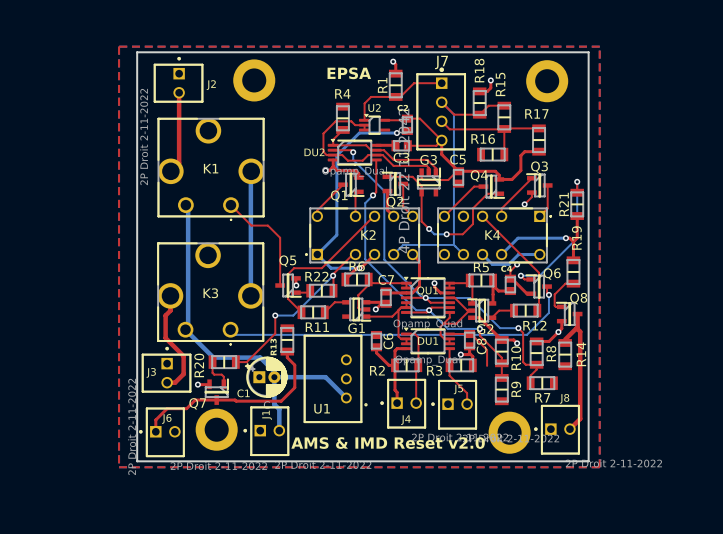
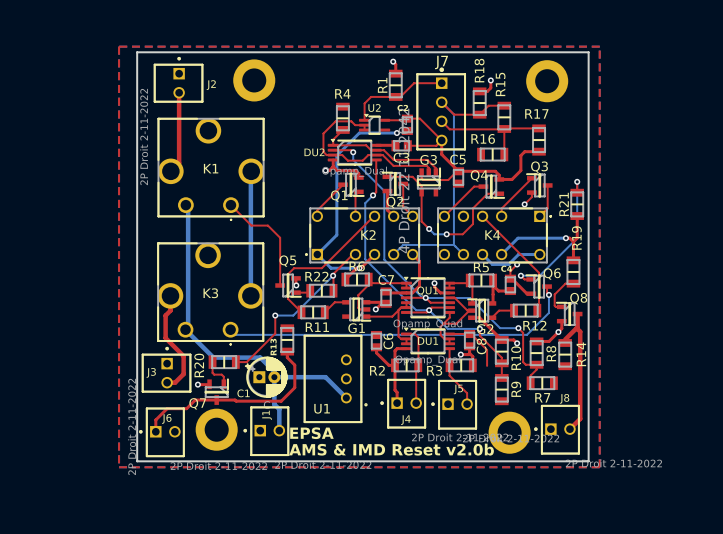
text: EPSA (349, 73) -> none
text: none -> EPSA (311, 433)
text: AMS & IMD Reset v2.0 (388, 443) -> AMS & IMD Reset v2.0b (391, 449)

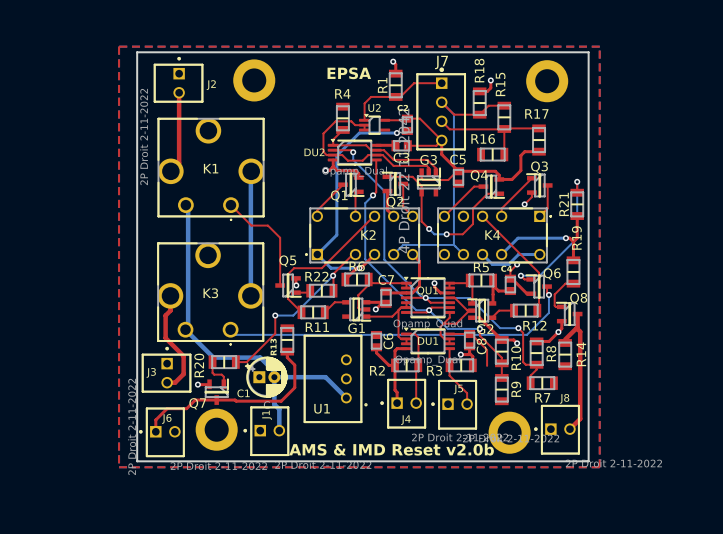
text: none -> EPSA (349, 73)
text: EPSA (311, 433) -> none

